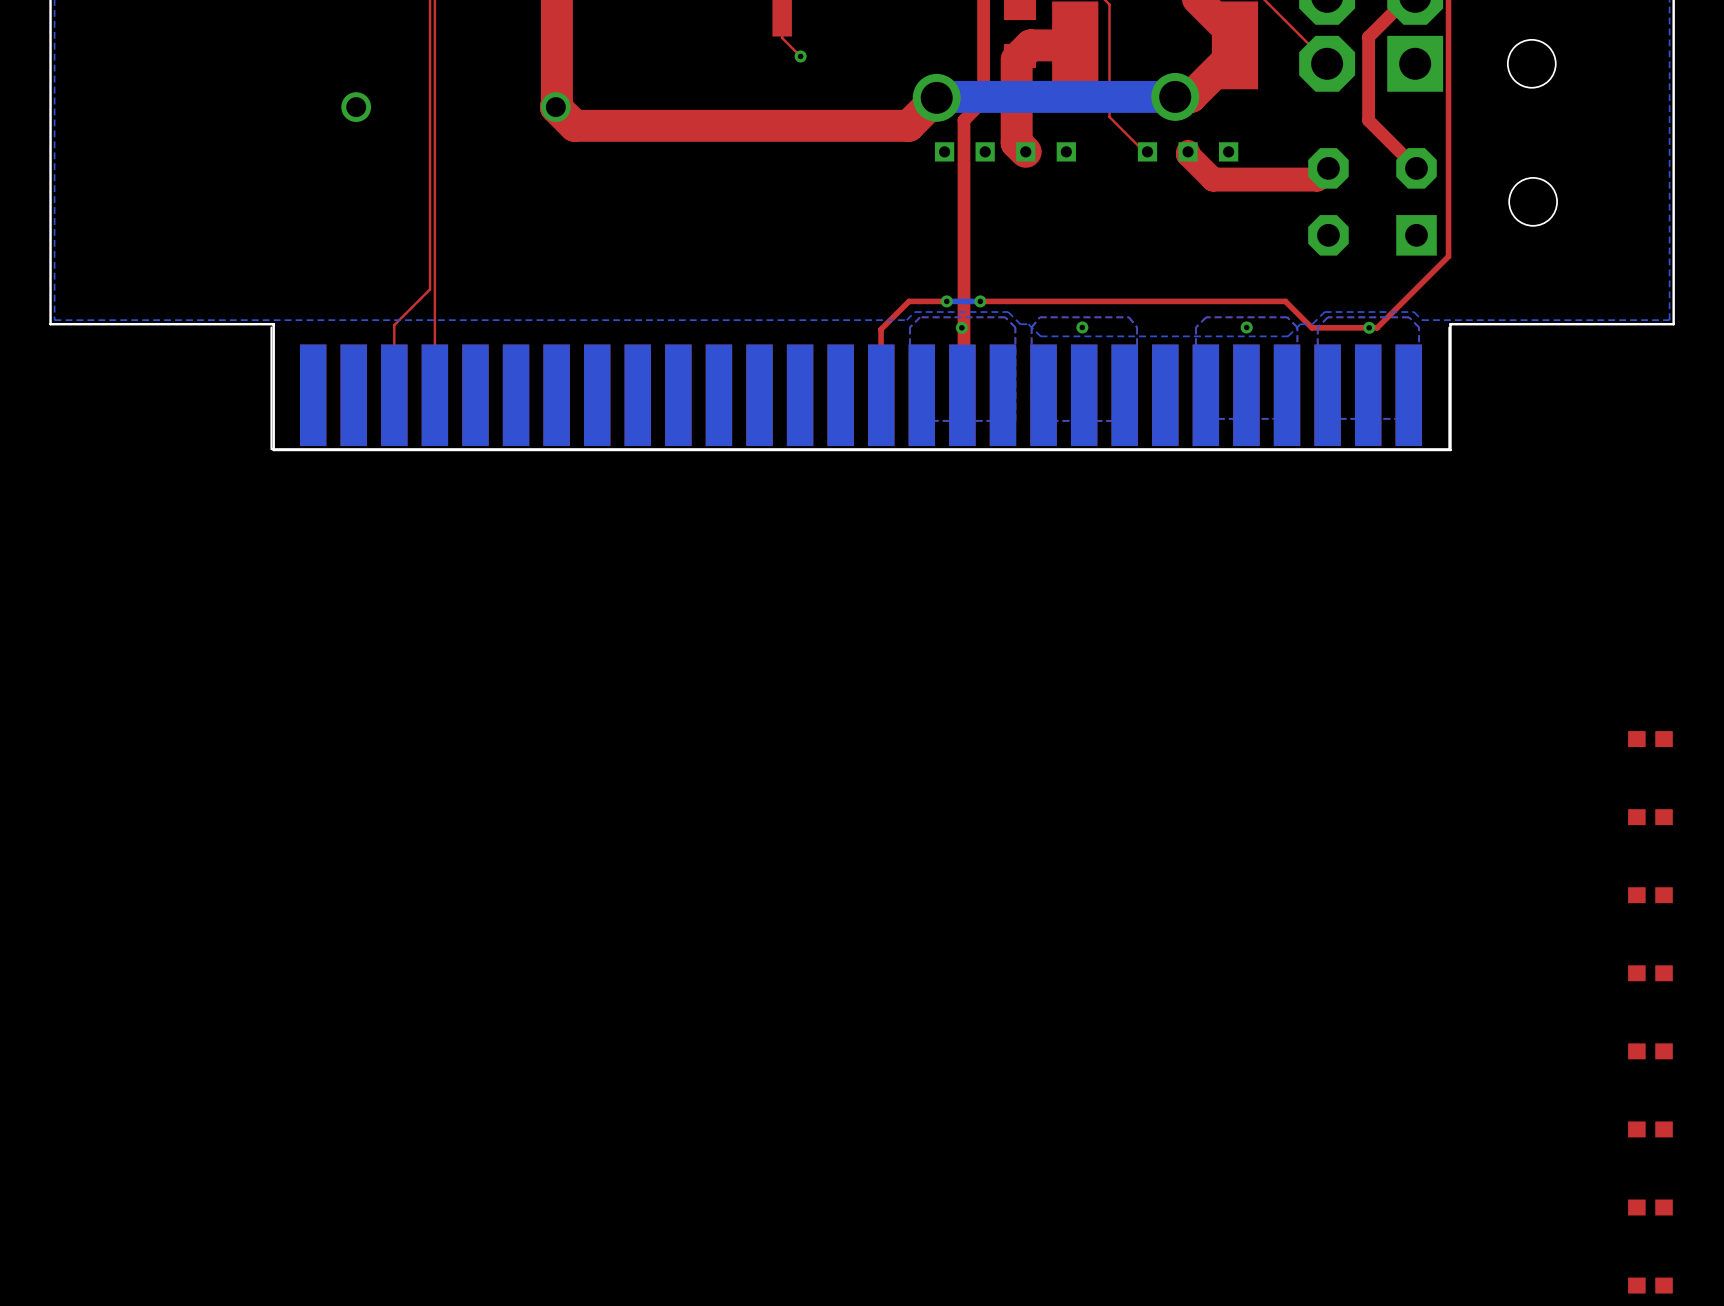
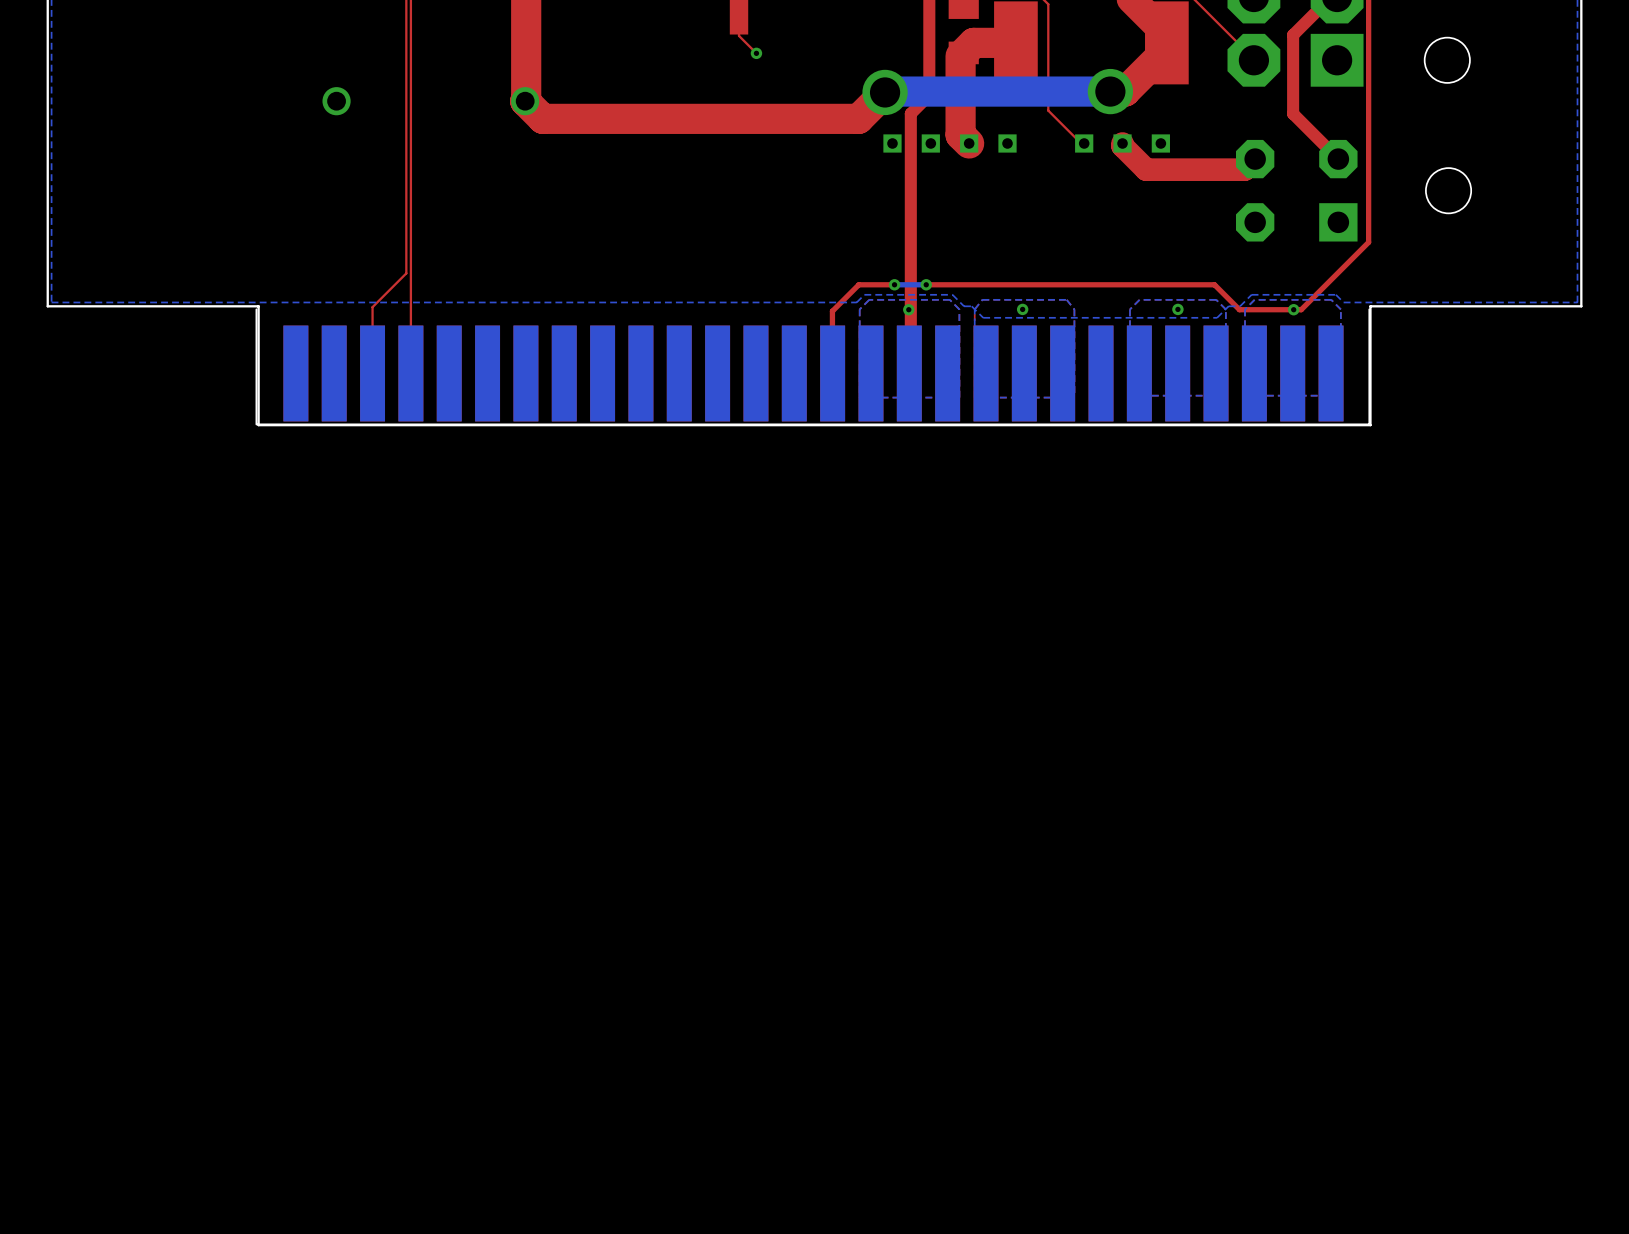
part: (1650, 739) -> none
part: (1650, 817) -> none
part: (1650, 895) -> none
part: (1650, 973) -> none
part: (1650, 1051) -> none
part: (1650, 1129) -> none
part: (1650, 1207) -> none
part: (1650, 1285) -> none

